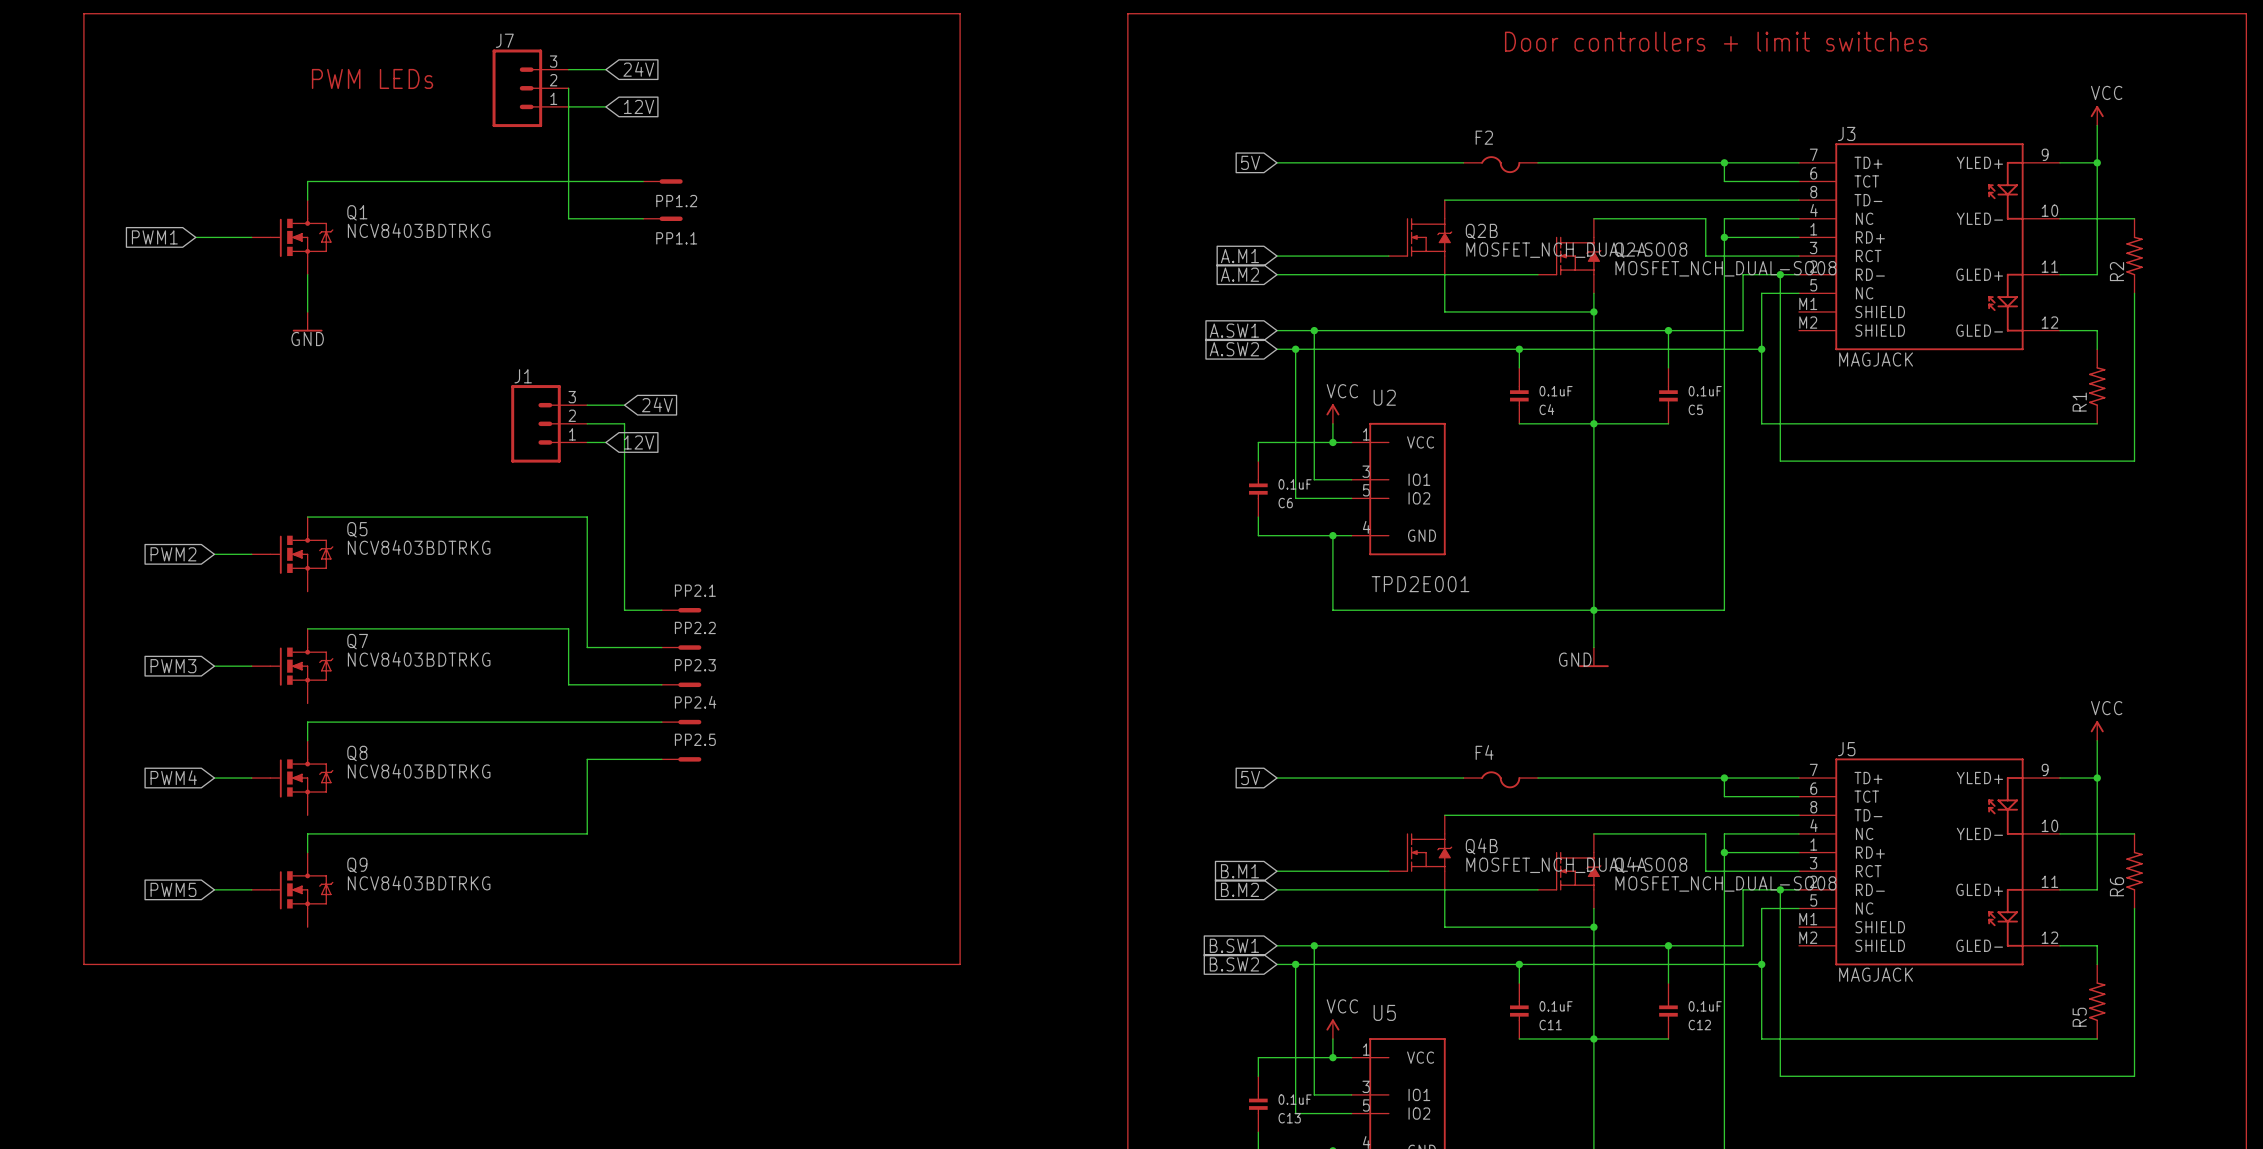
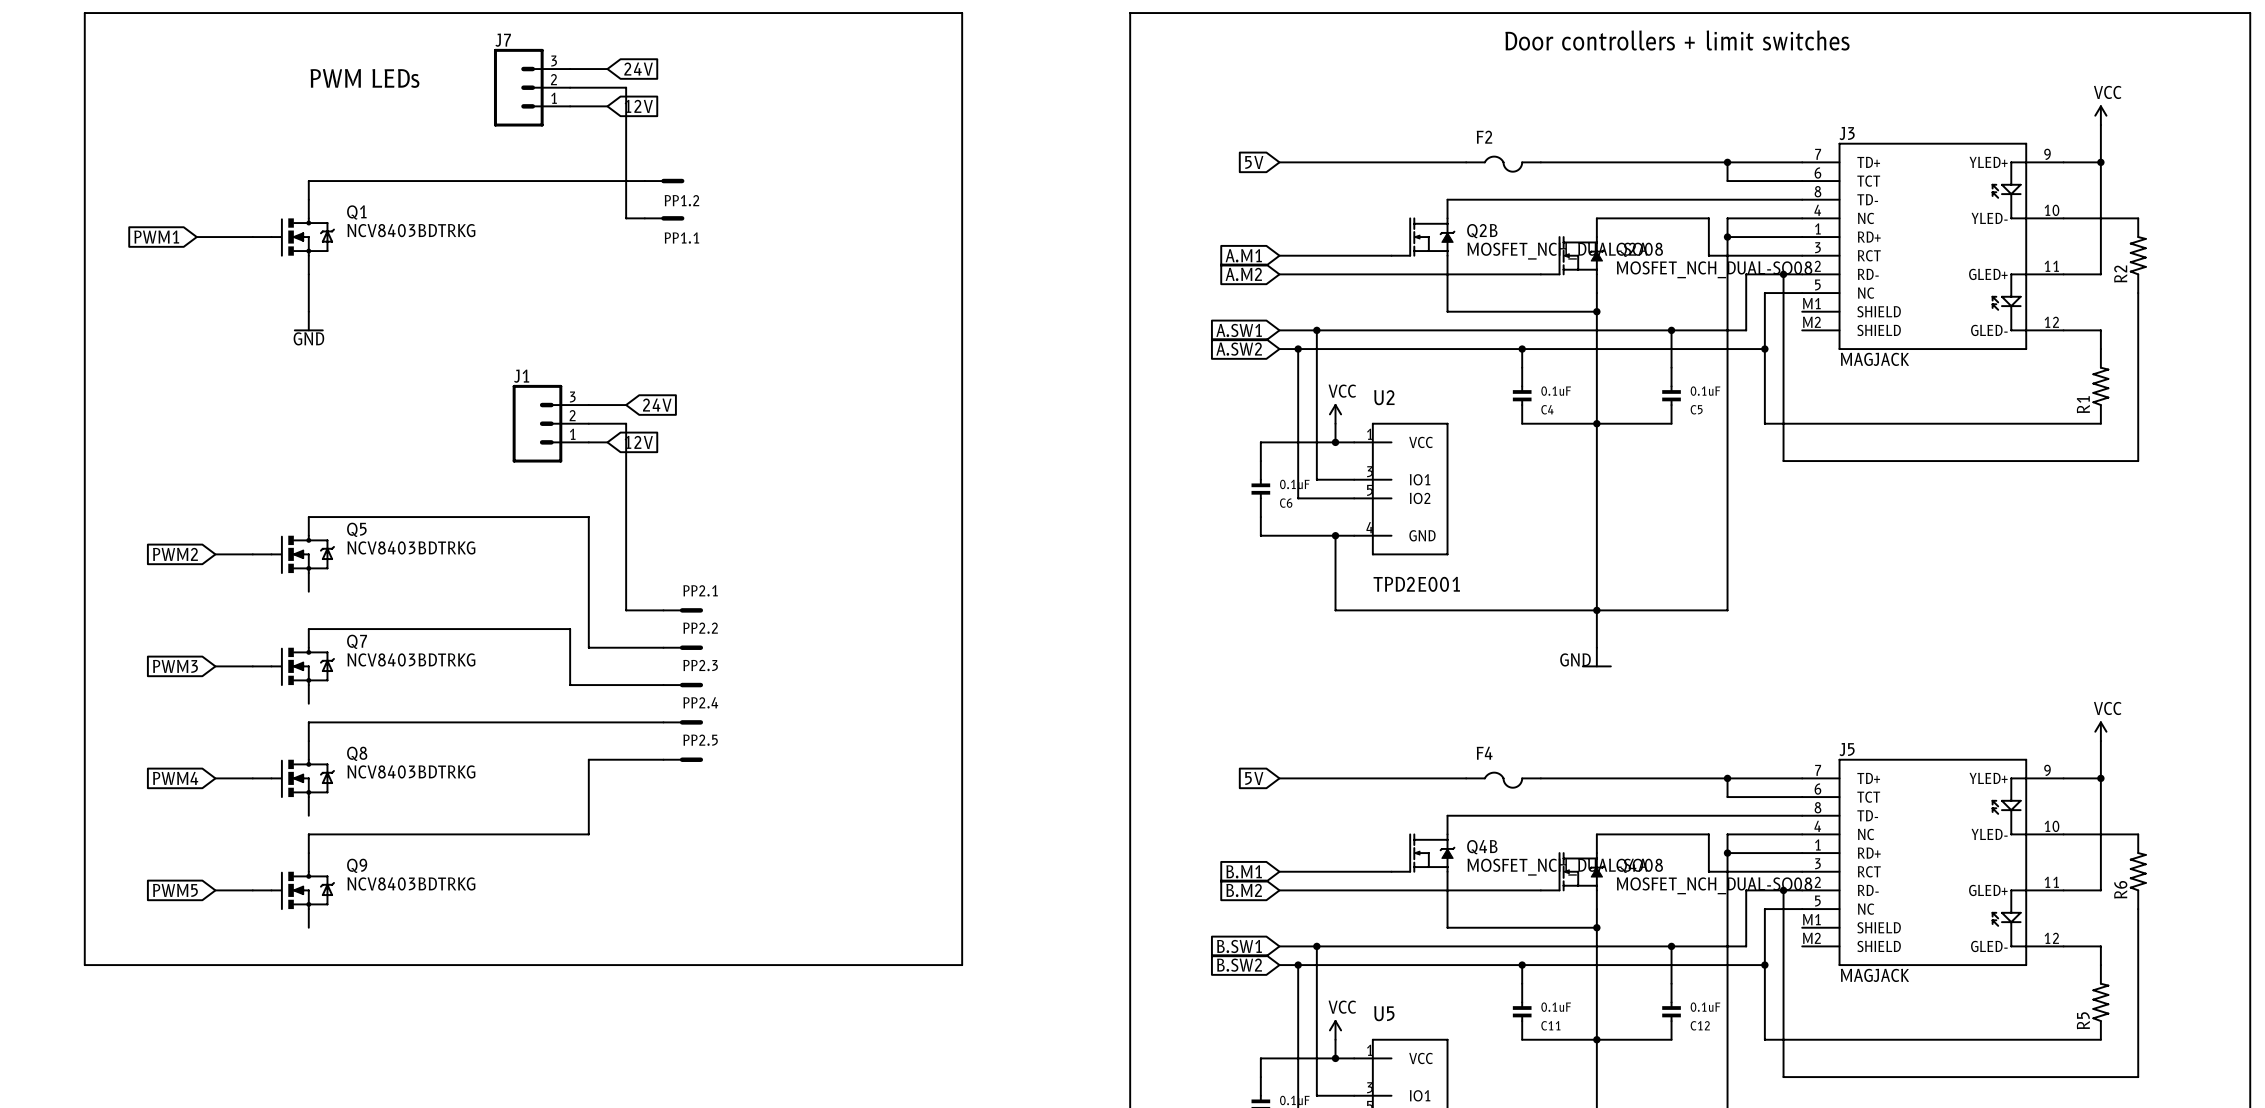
wire: (568, 88) (568, 218) (624, 218) -> (570, 87) (626, 87) (626, 218)

